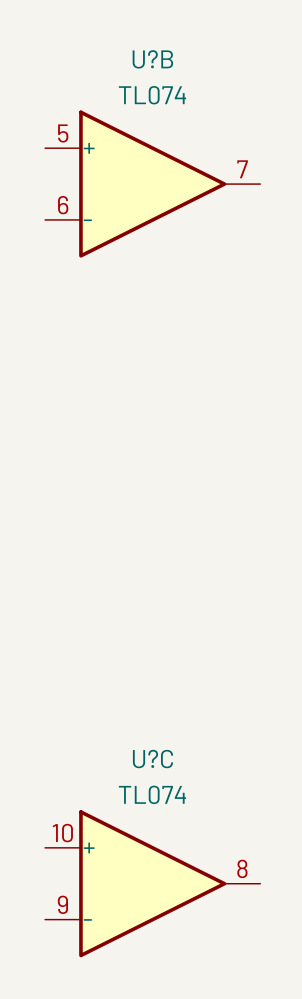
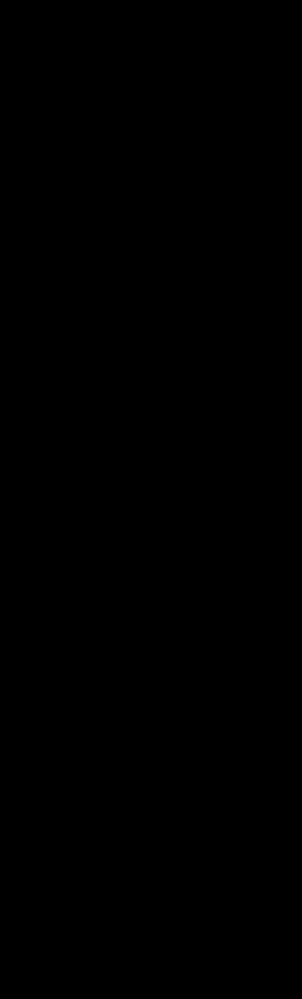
U?B: TL074 (152, 184) -> none
U?C: TL074 (152, 883) -> none

